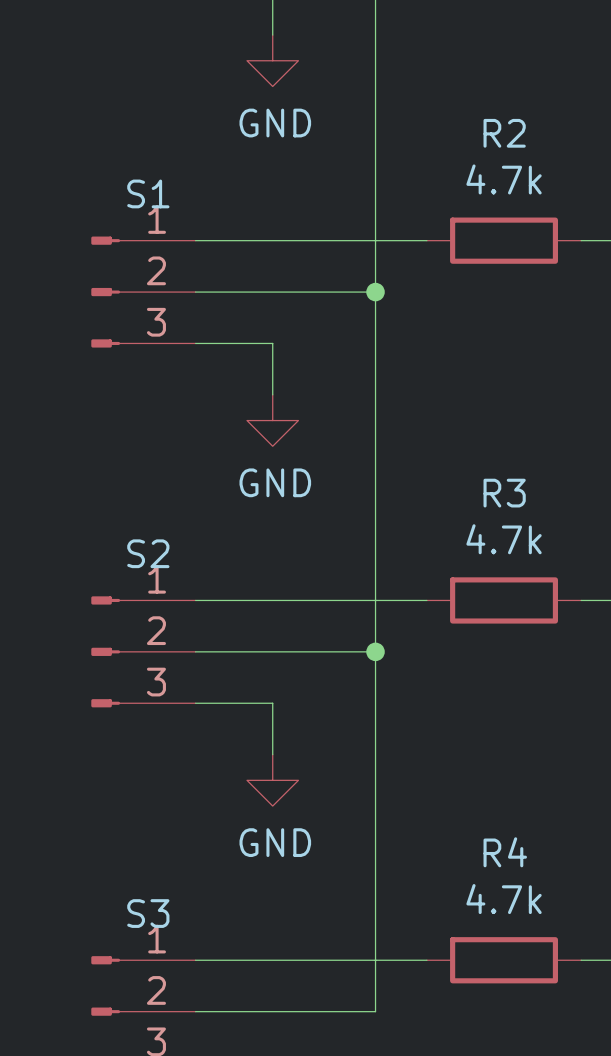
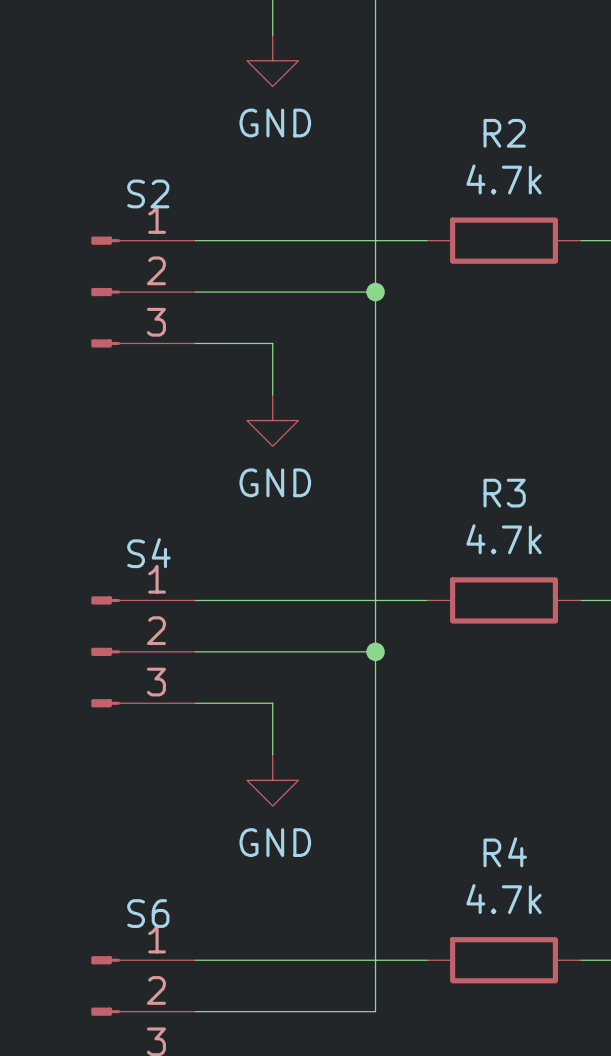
S1 name: S1 (148, 193) -> S2 (148, 193)
S2 name: S2 (148, 553) -> S4 (148, 553)
S3 name: S3 (148, 913) -> S6 (148, 913)

